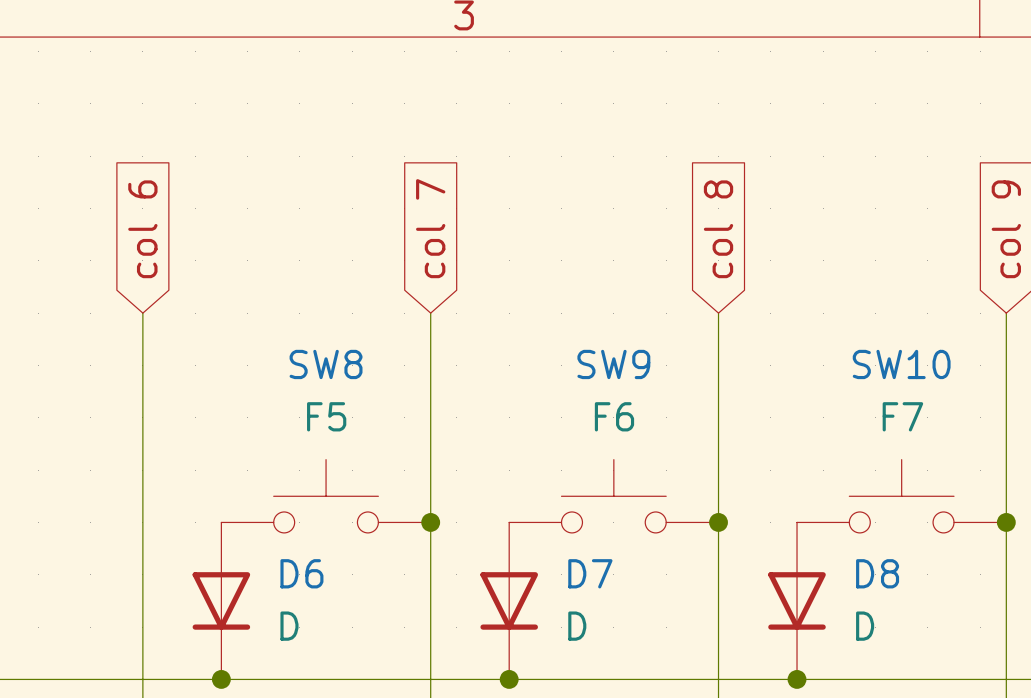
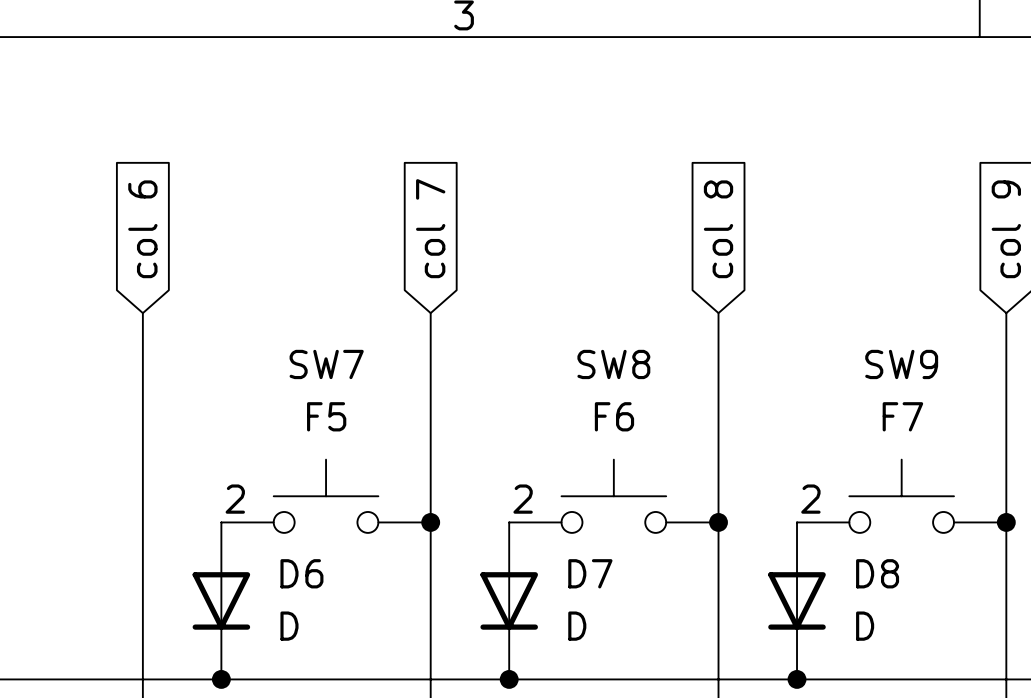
SW8 name: SW8 (326, 364) -> SW7 (326, 364)
SW9 name: SW9 (613, 364) -> SW8 (613, 364)
SW10 name: SW10 (901, 364) -> SW9 (901, 364)
label: none -> 2 (235, 499)
label: none -> 2 (523, 499)
label: none -> 2 (810, 499)

